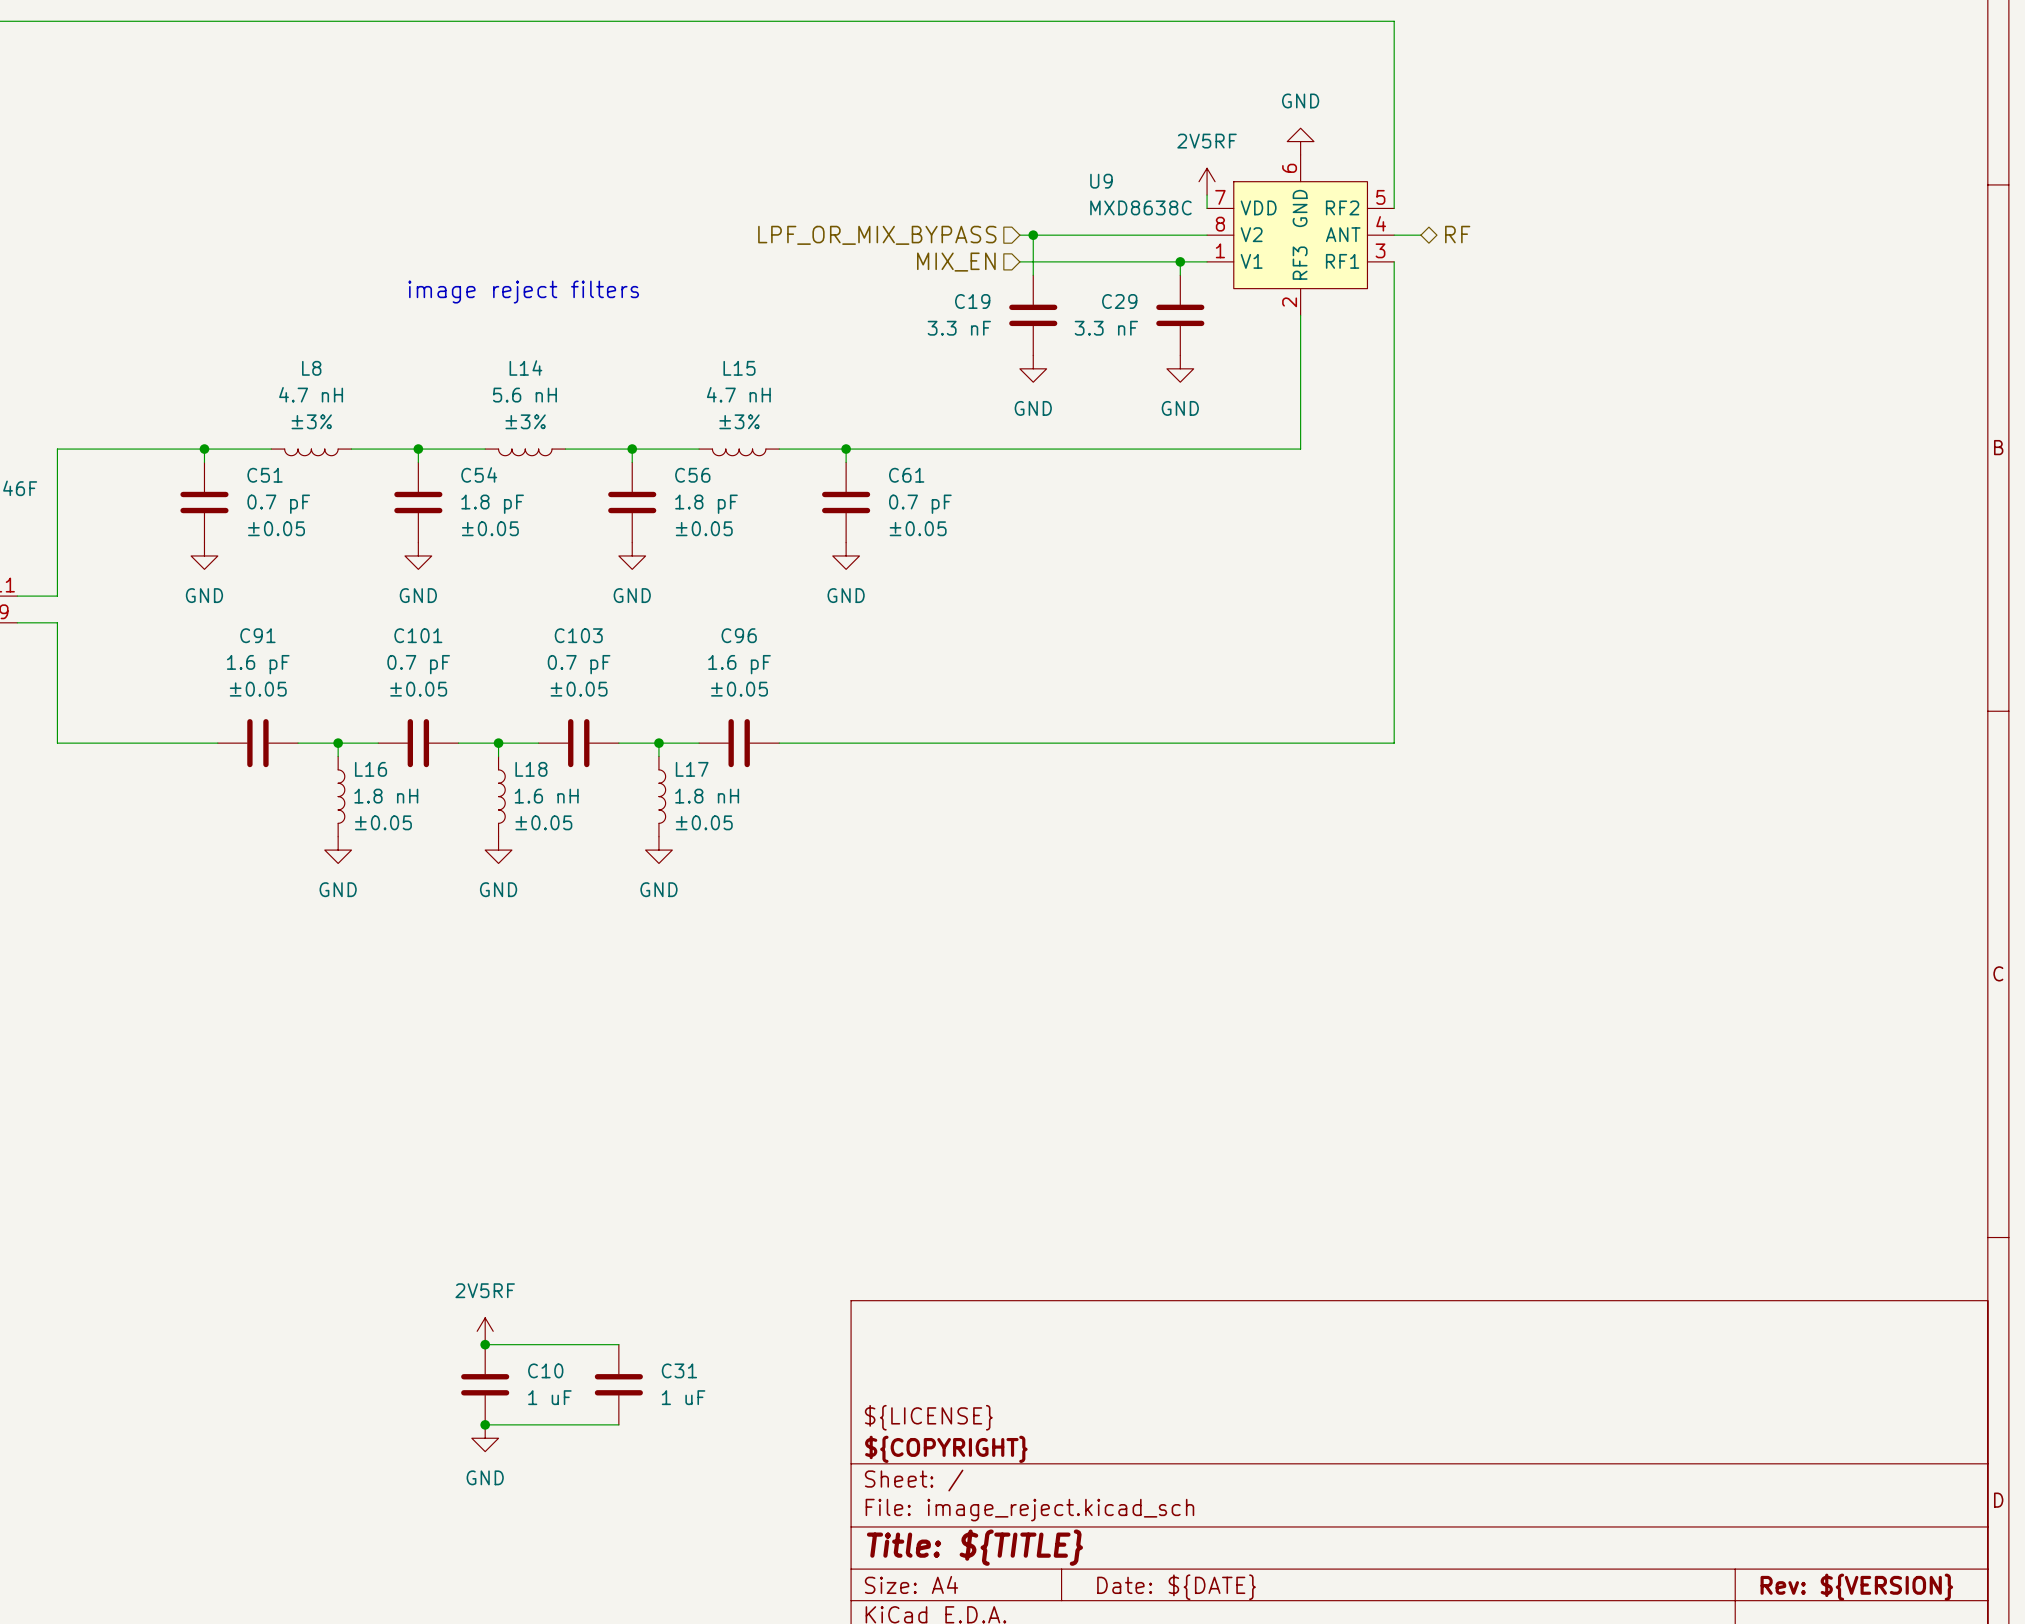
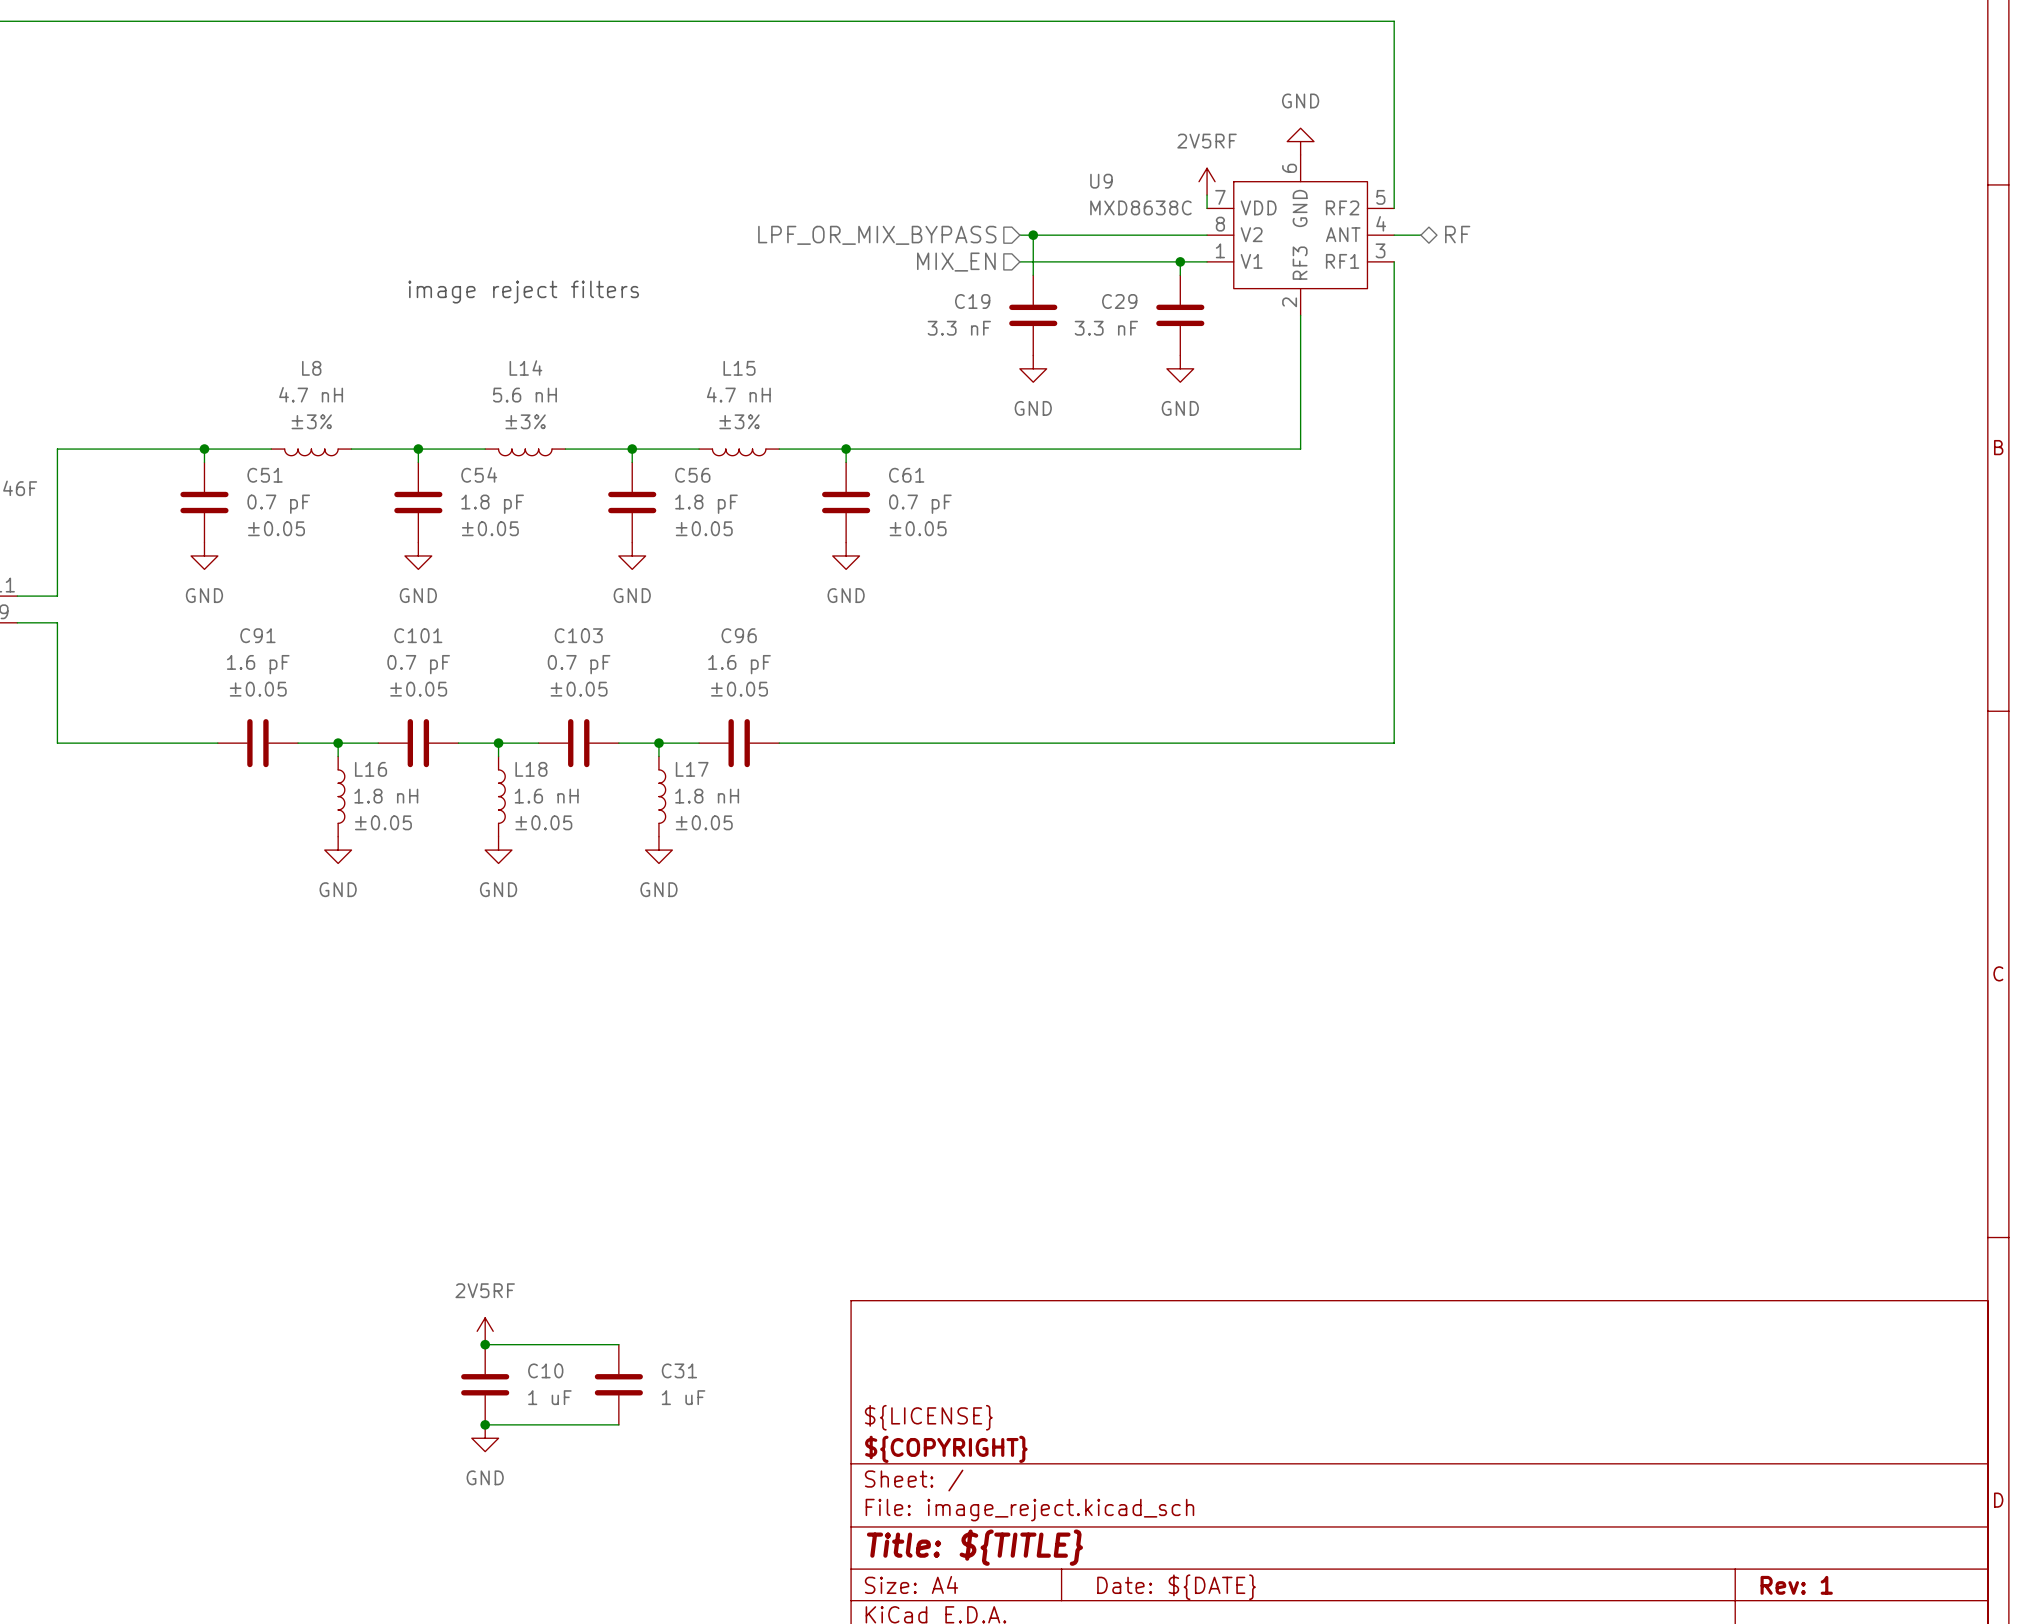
title block: Rev: ${VERSION} (1856, 1587) -> Rev: 1 (1796, 1585)

